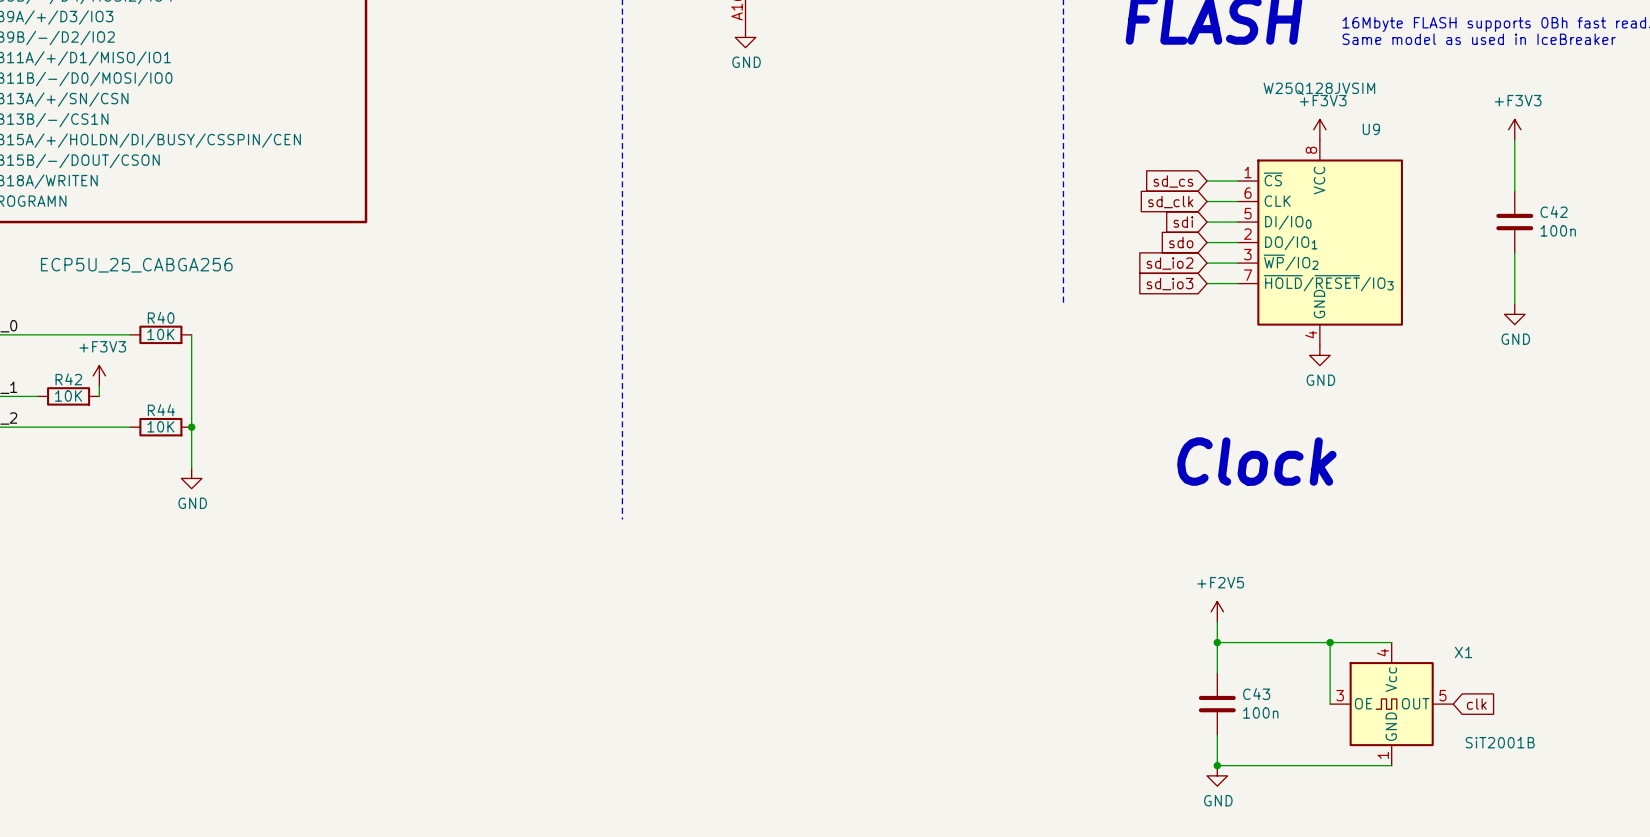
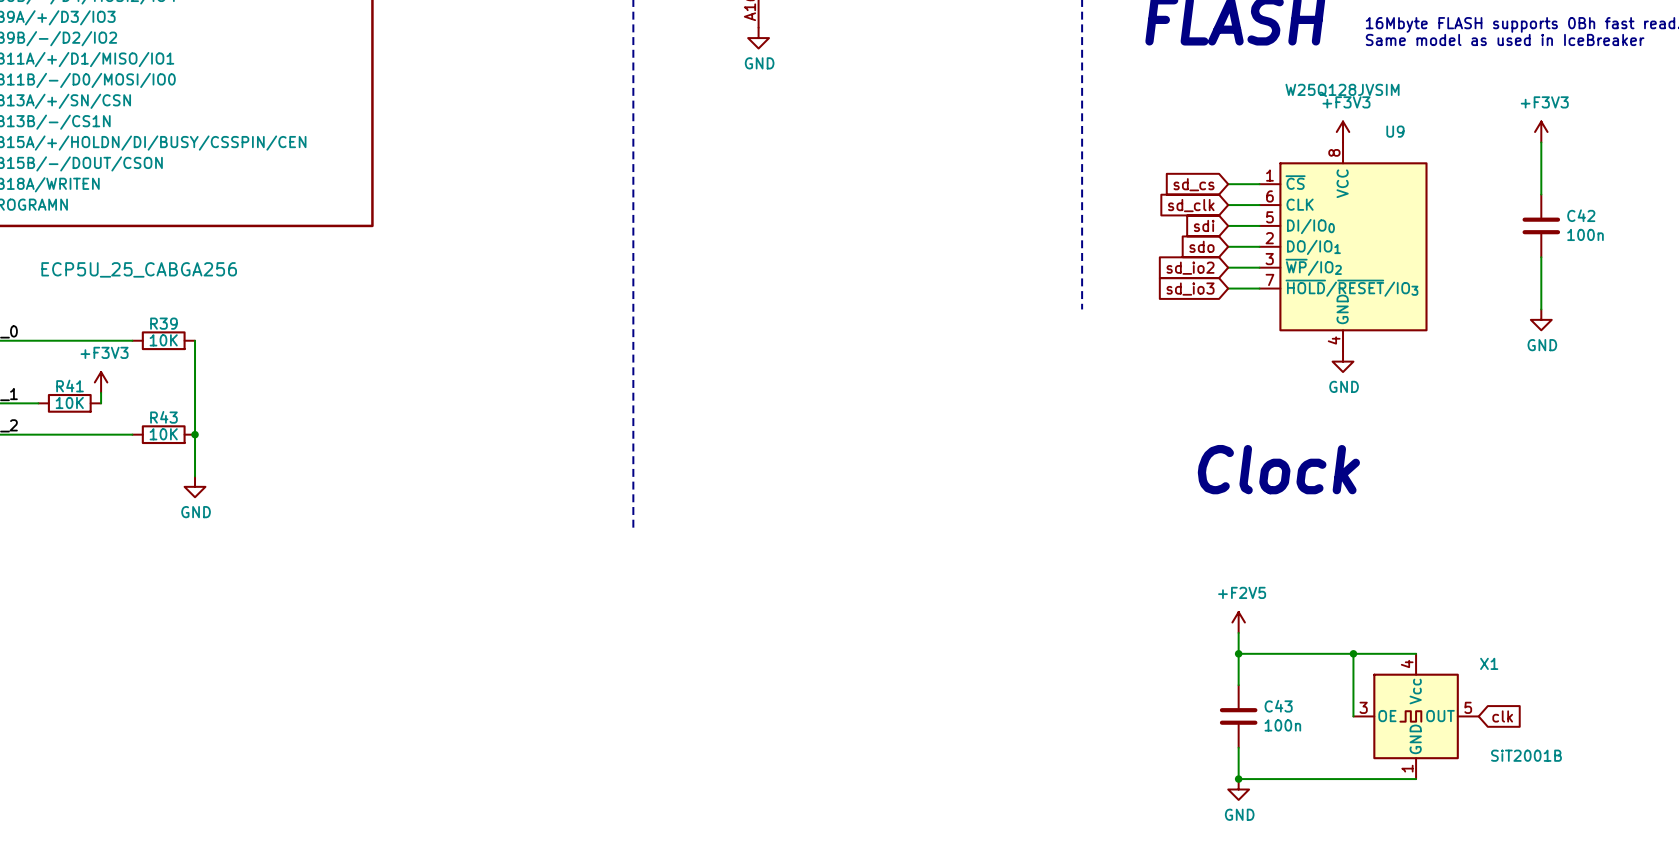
R40 name: R40 (161, 317) -> R39 (163, 323)
R42 name: R42 (68, 379) -> R41 (70, 386)
R44 name: R44 (161, 410) -> R43 (163, 417)

